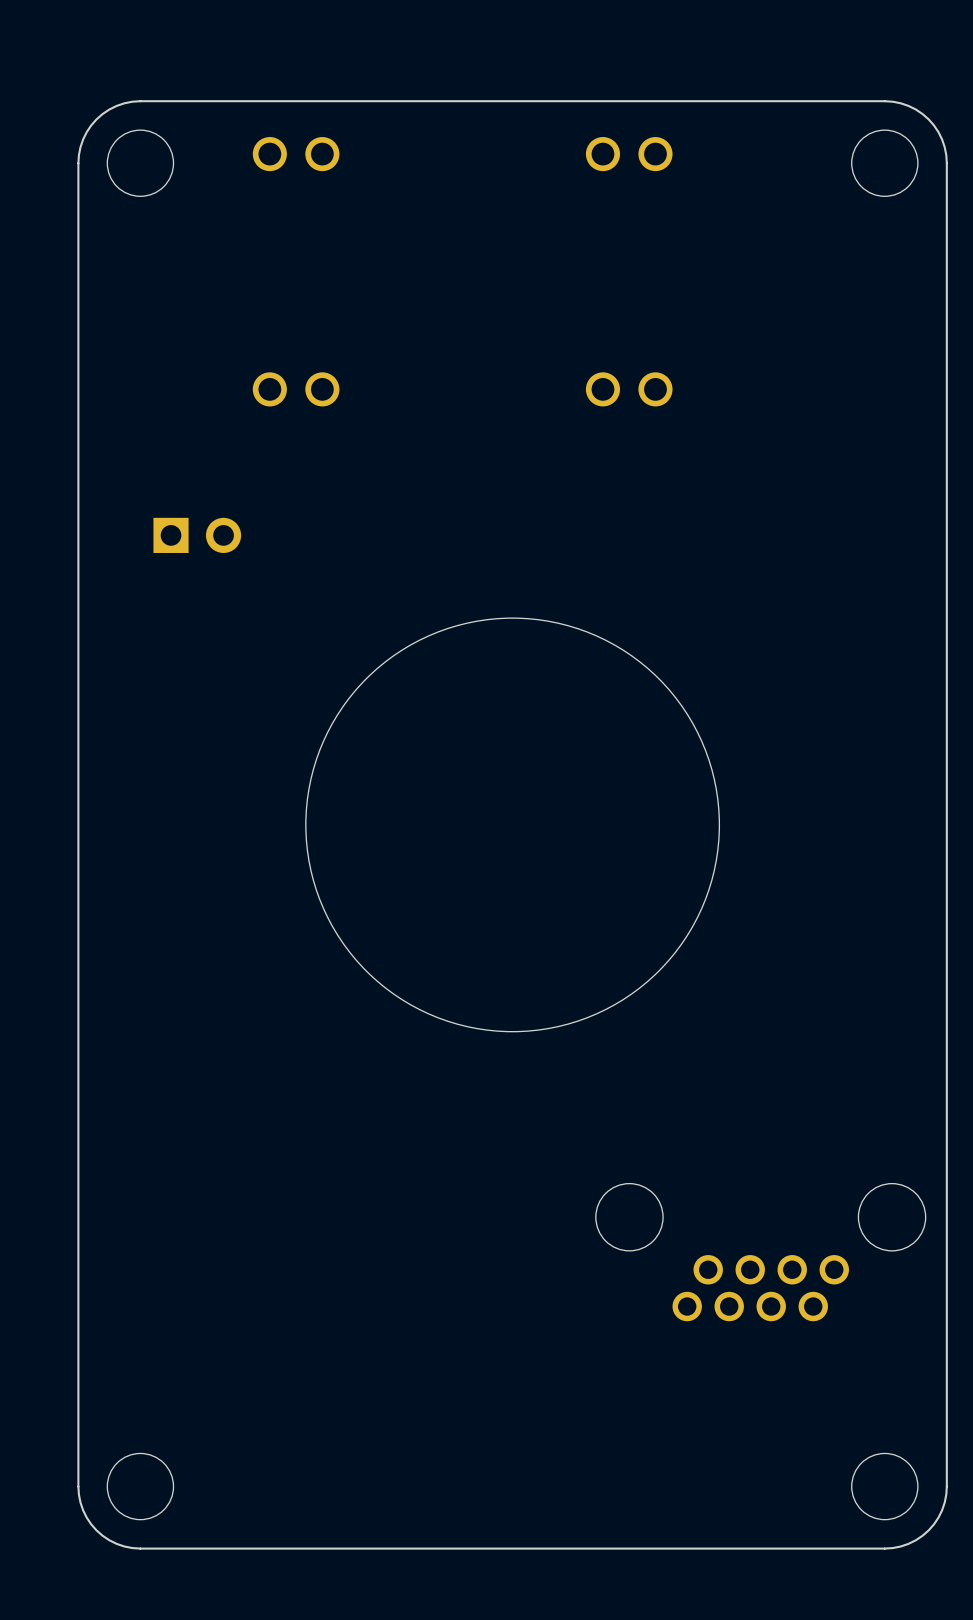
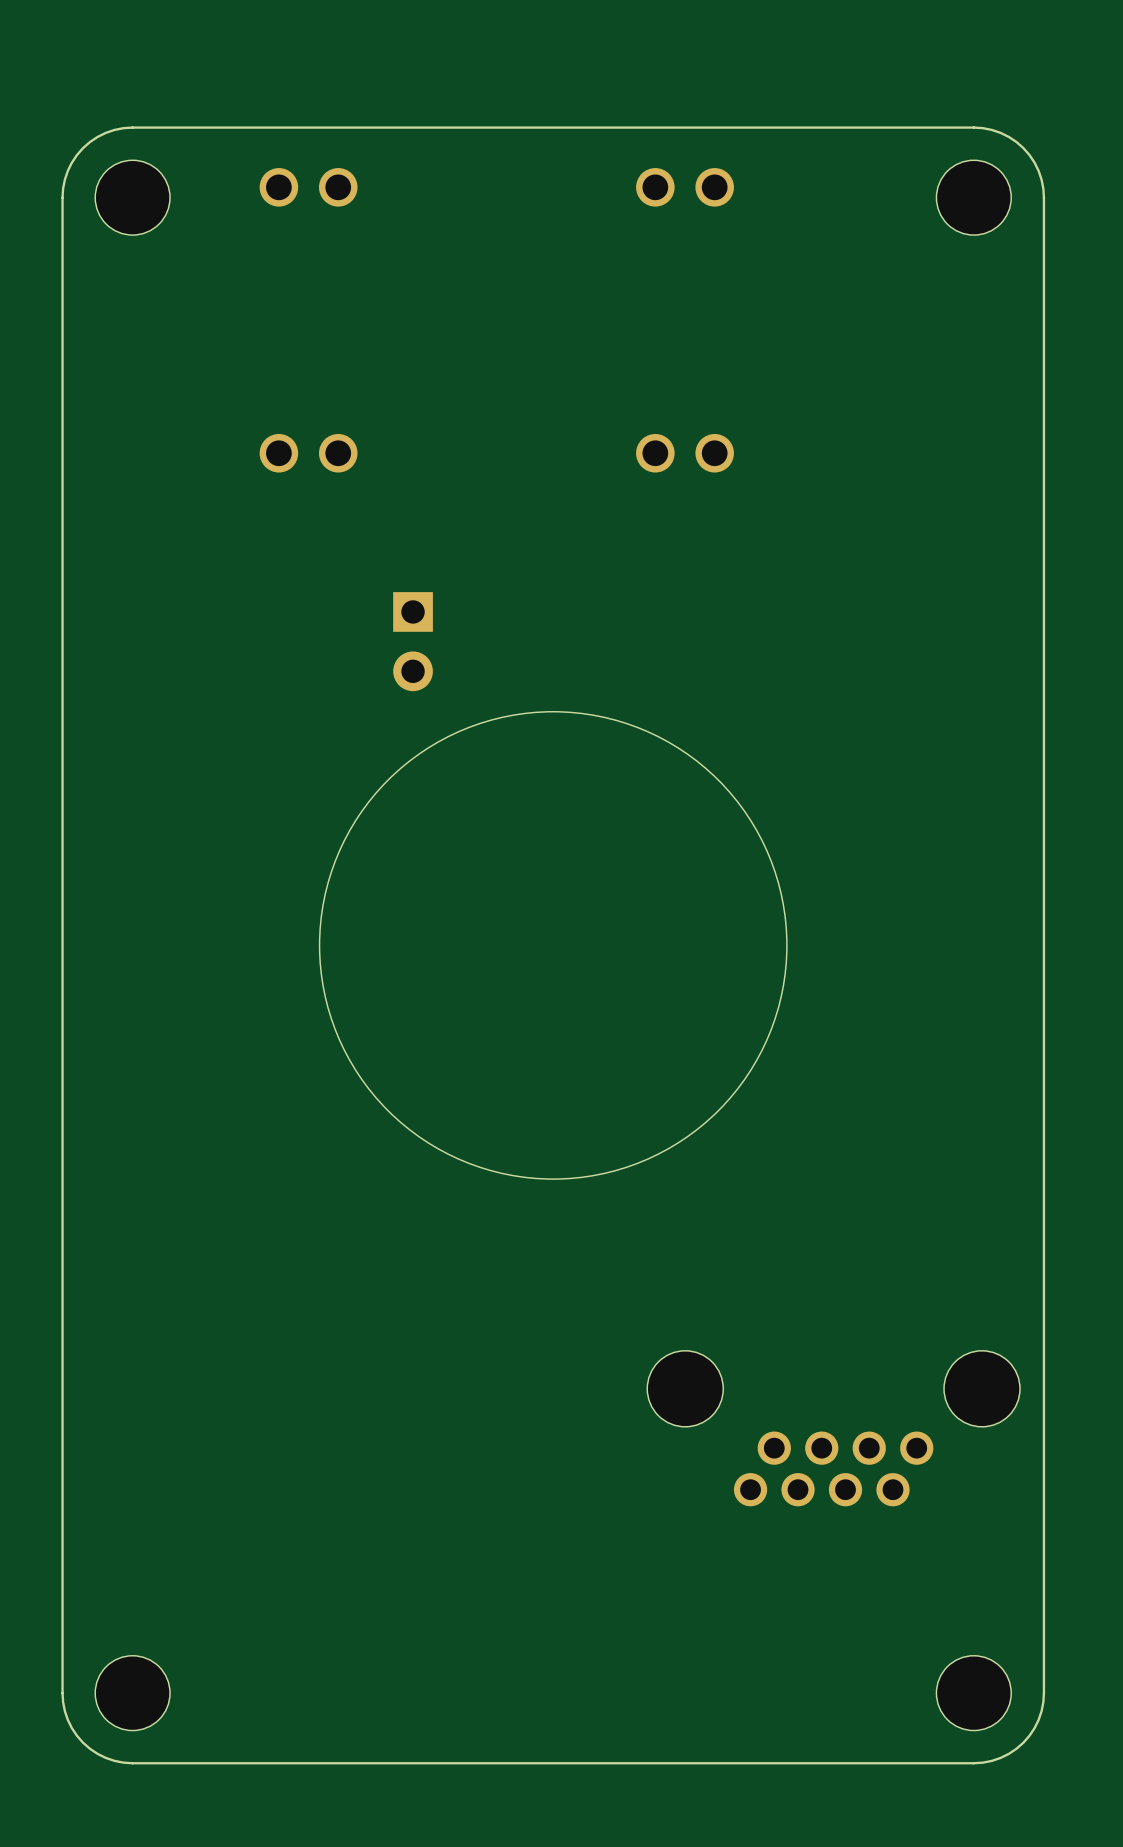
part rotation: 0° (197, 535) -> 90° clockwise (413, 641)
part position: (197, 535) -> (413, 641)

